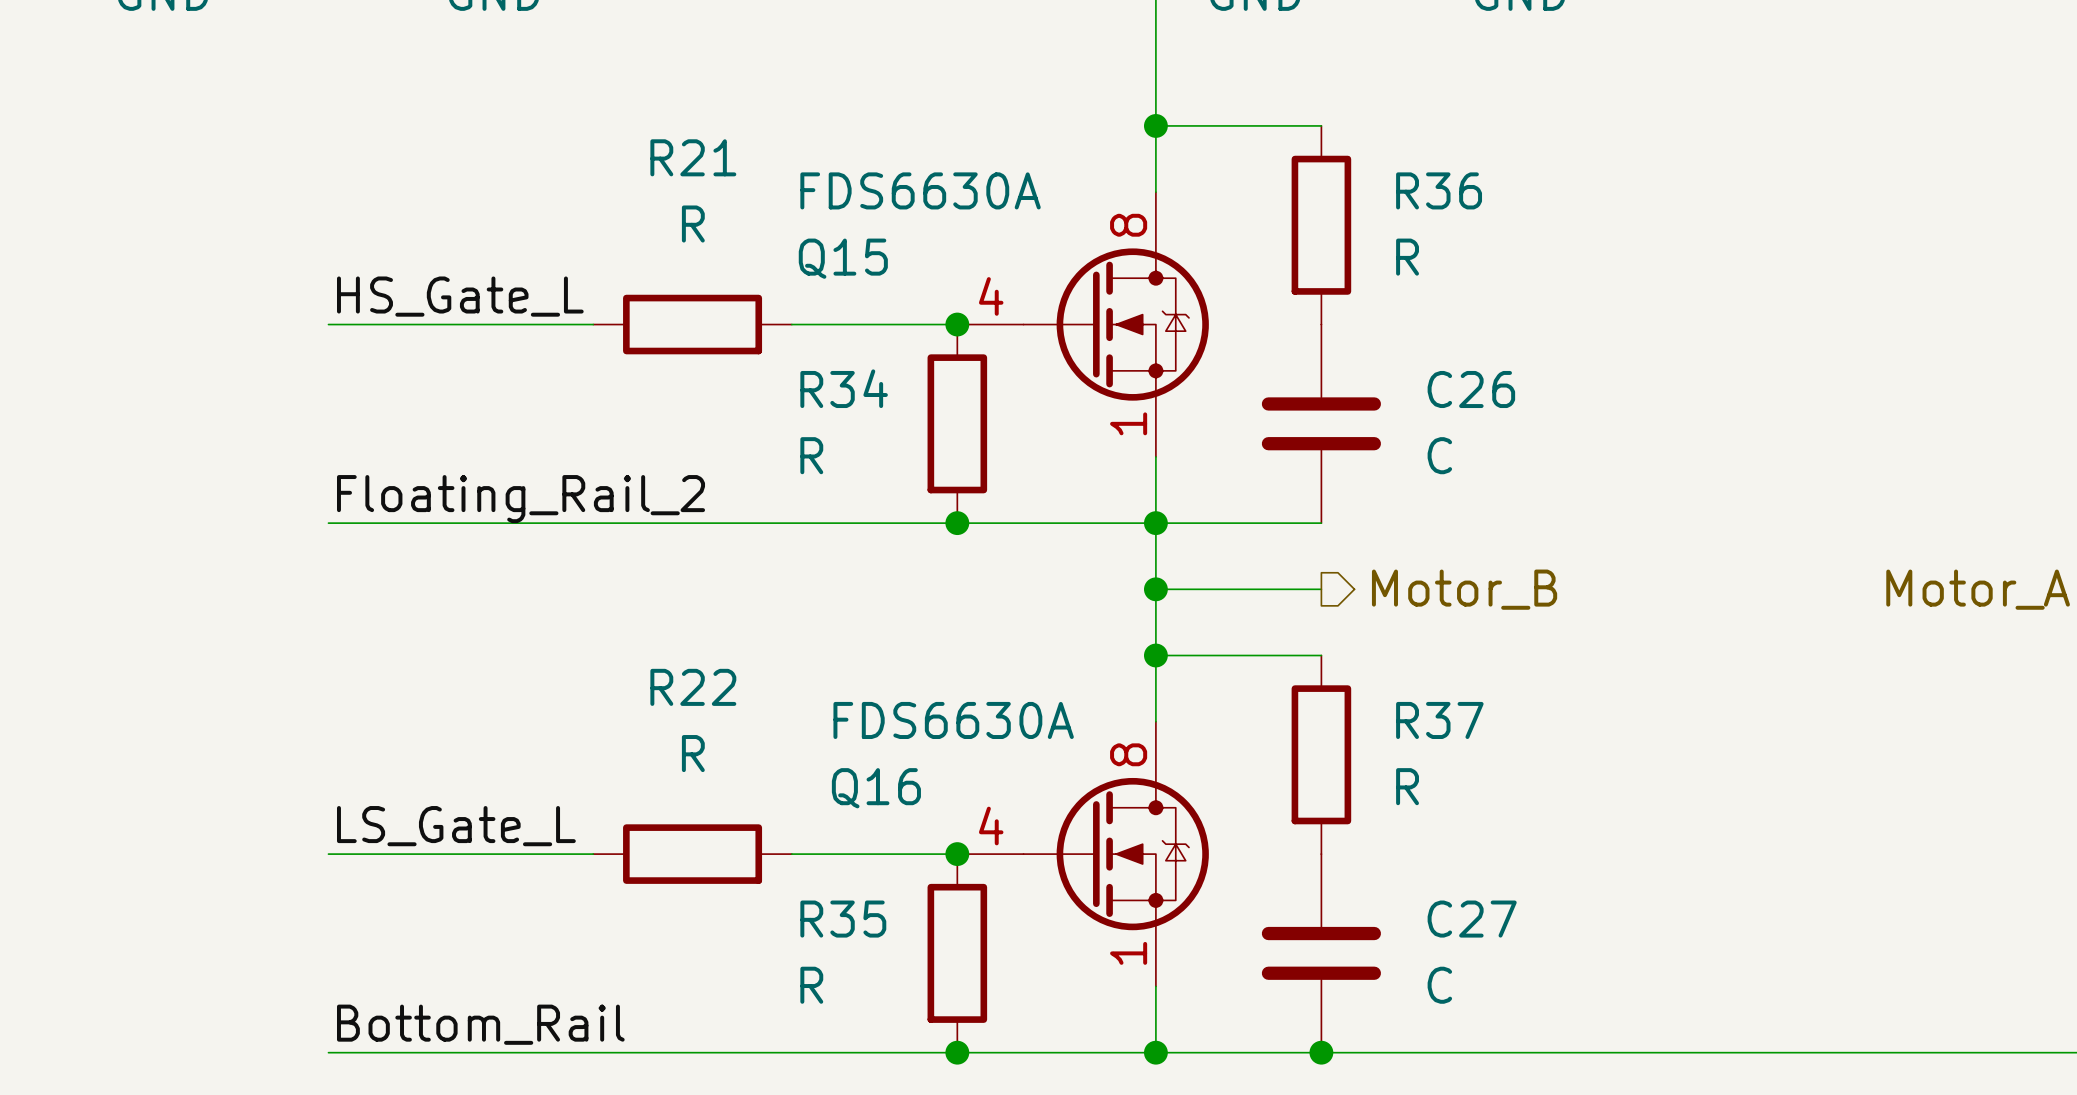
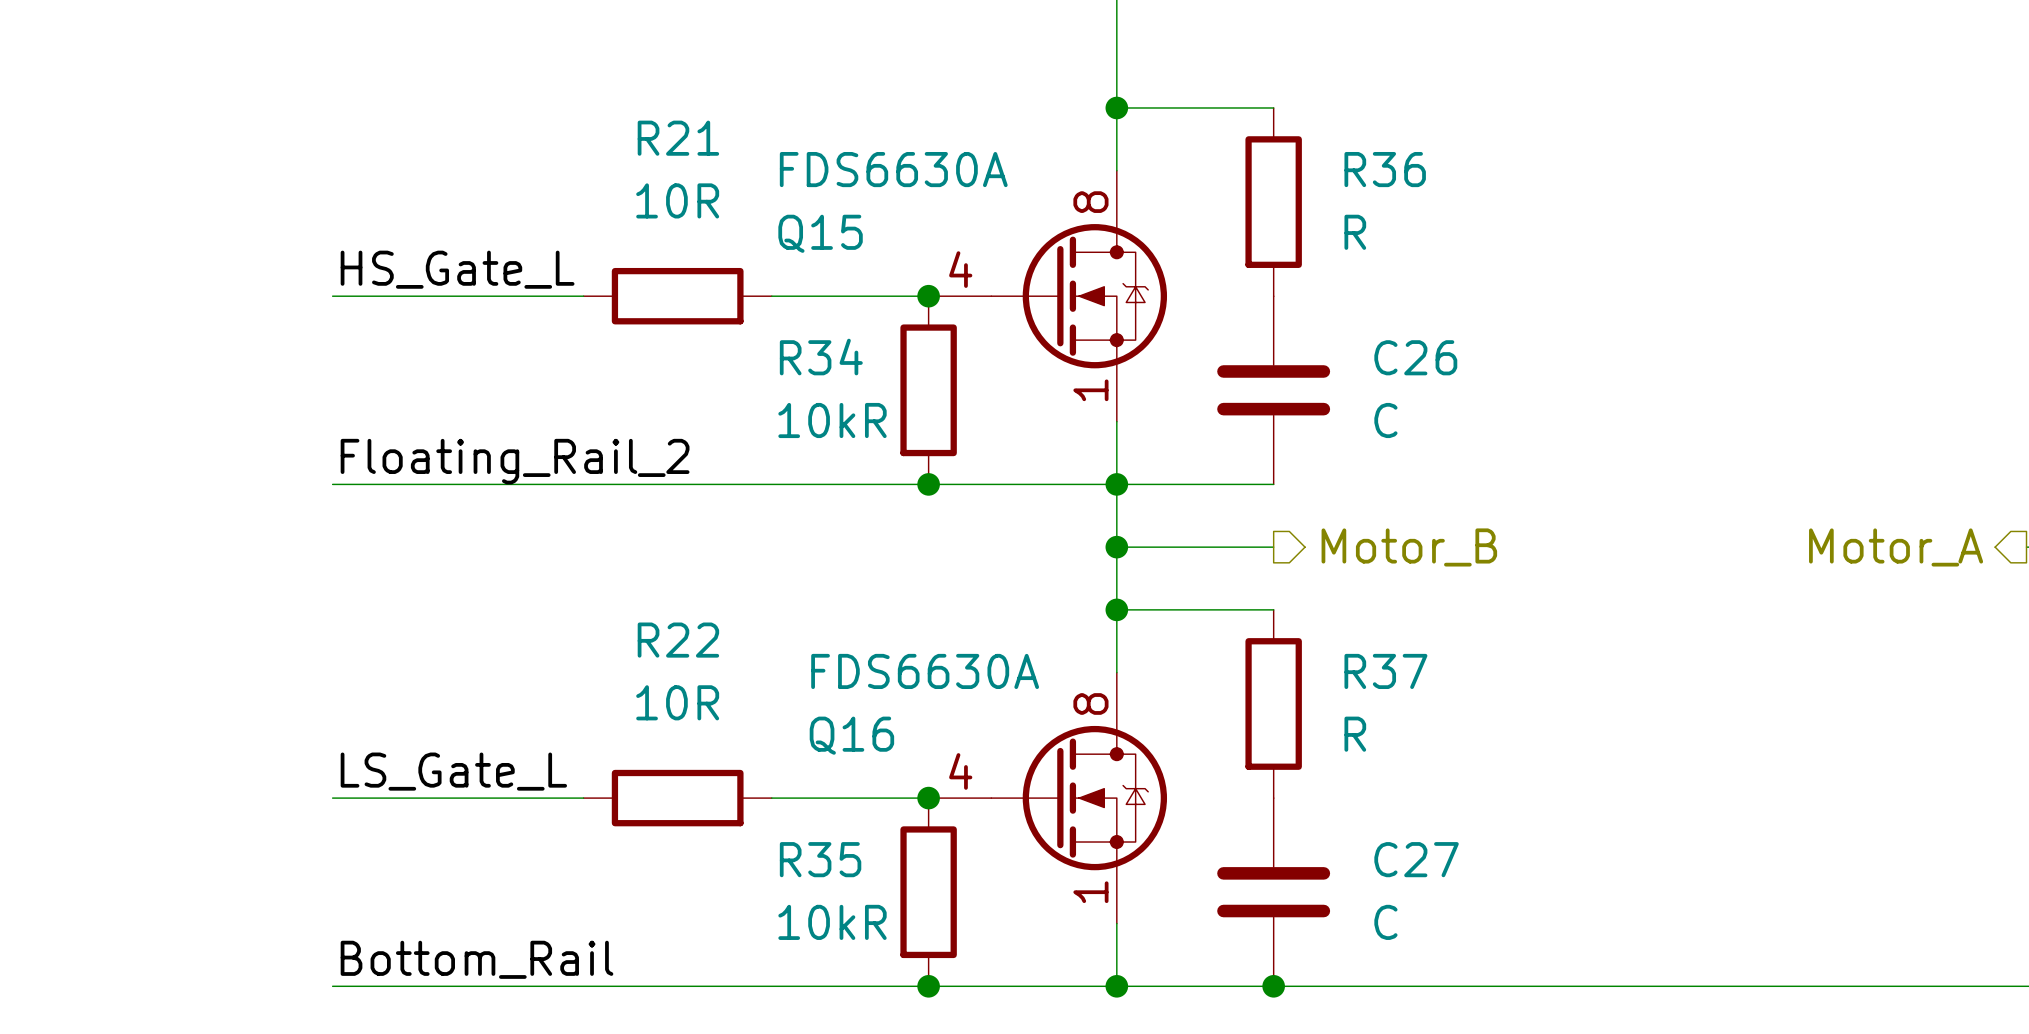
R21 value: R (693, 224) -> 10R (677, 200)
R34 value: R (811, 455) -> 10kR (832, 420)
R22 value: R (693, 753) -> 10R (677, 702)
R35 value: R (811, 985) -> 10kR (832, 922)

